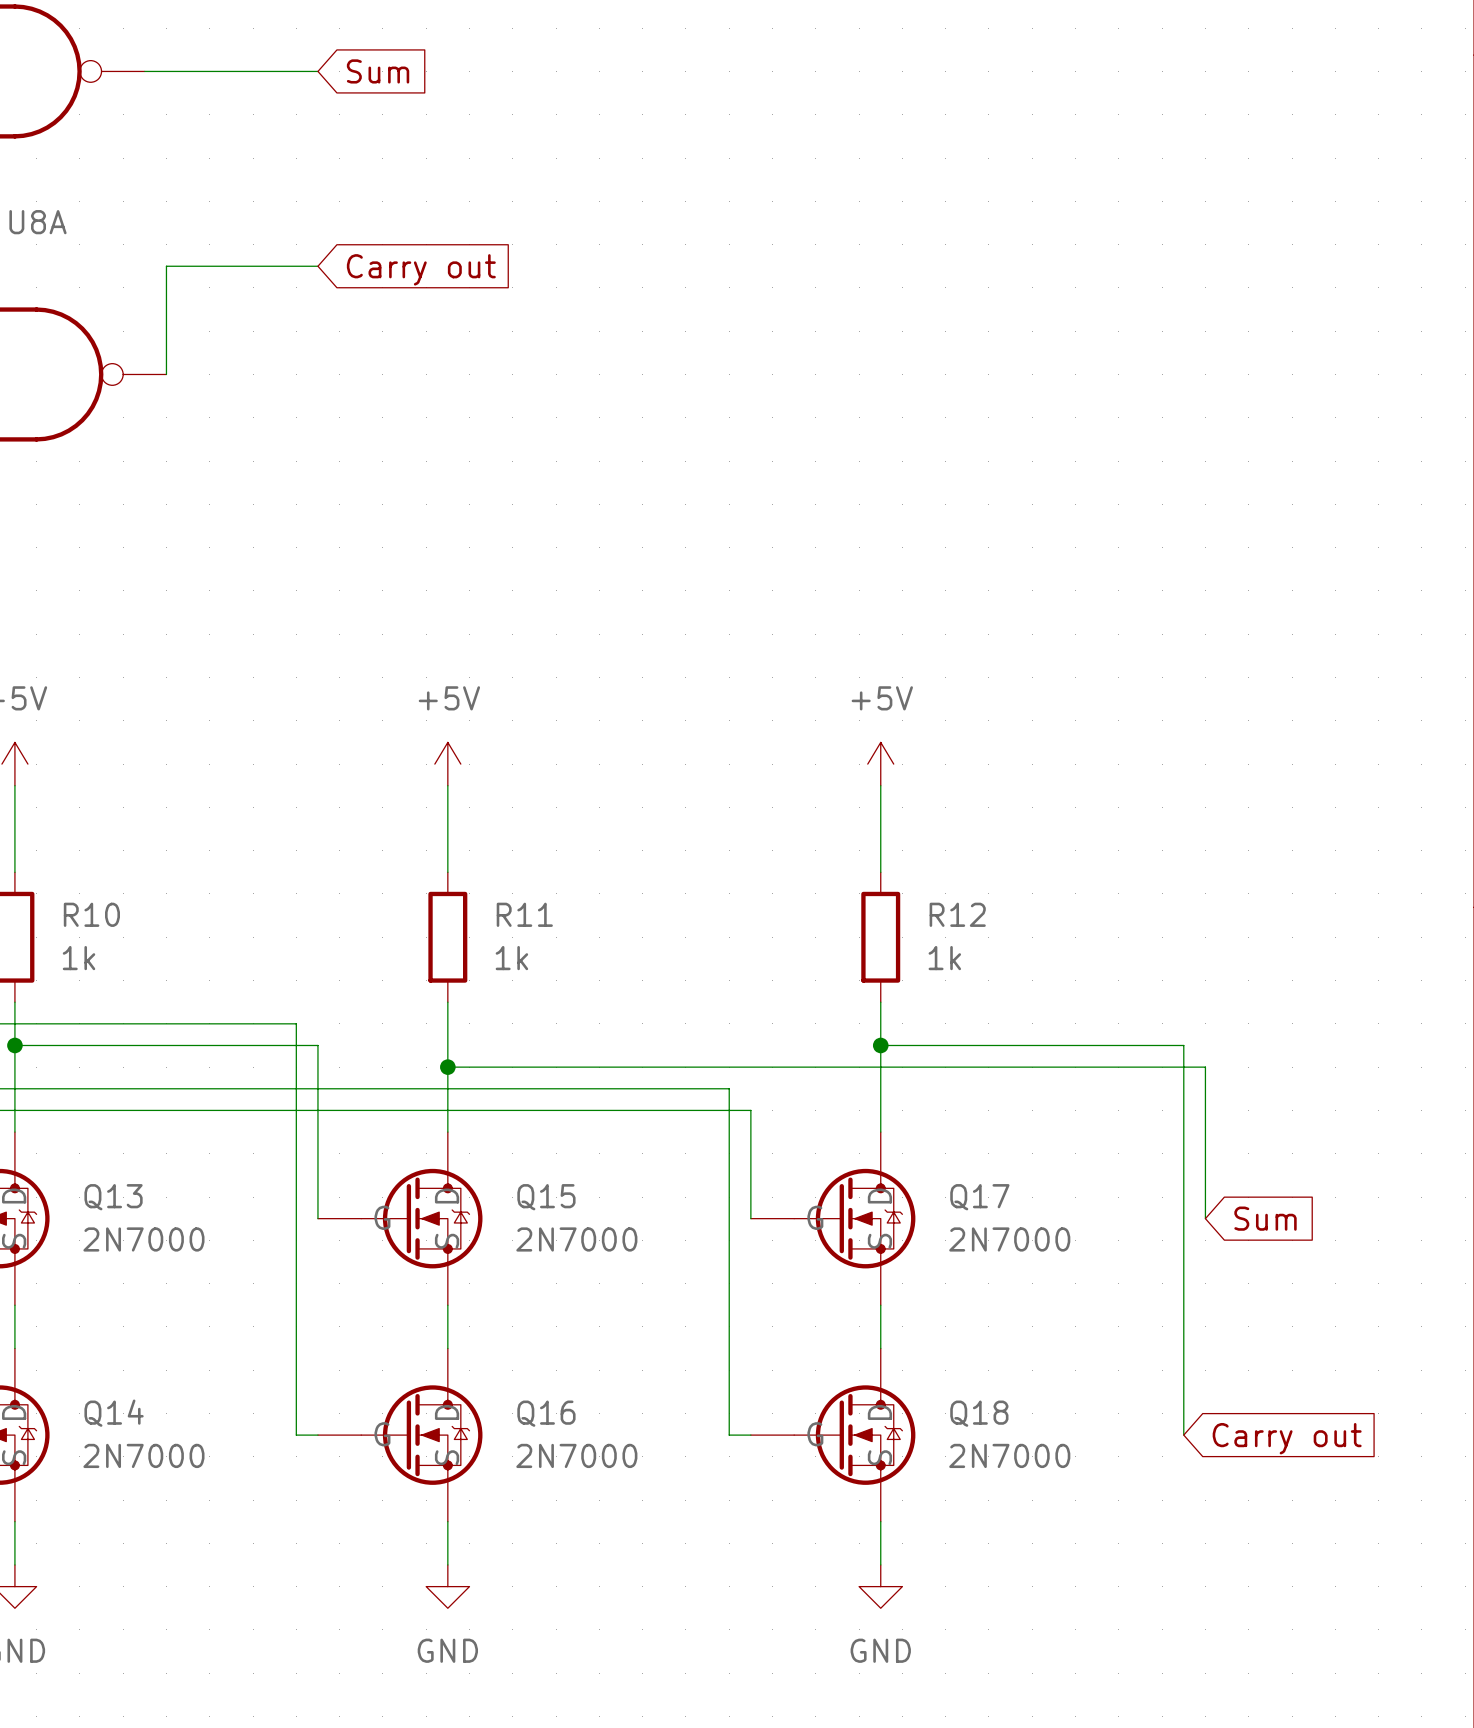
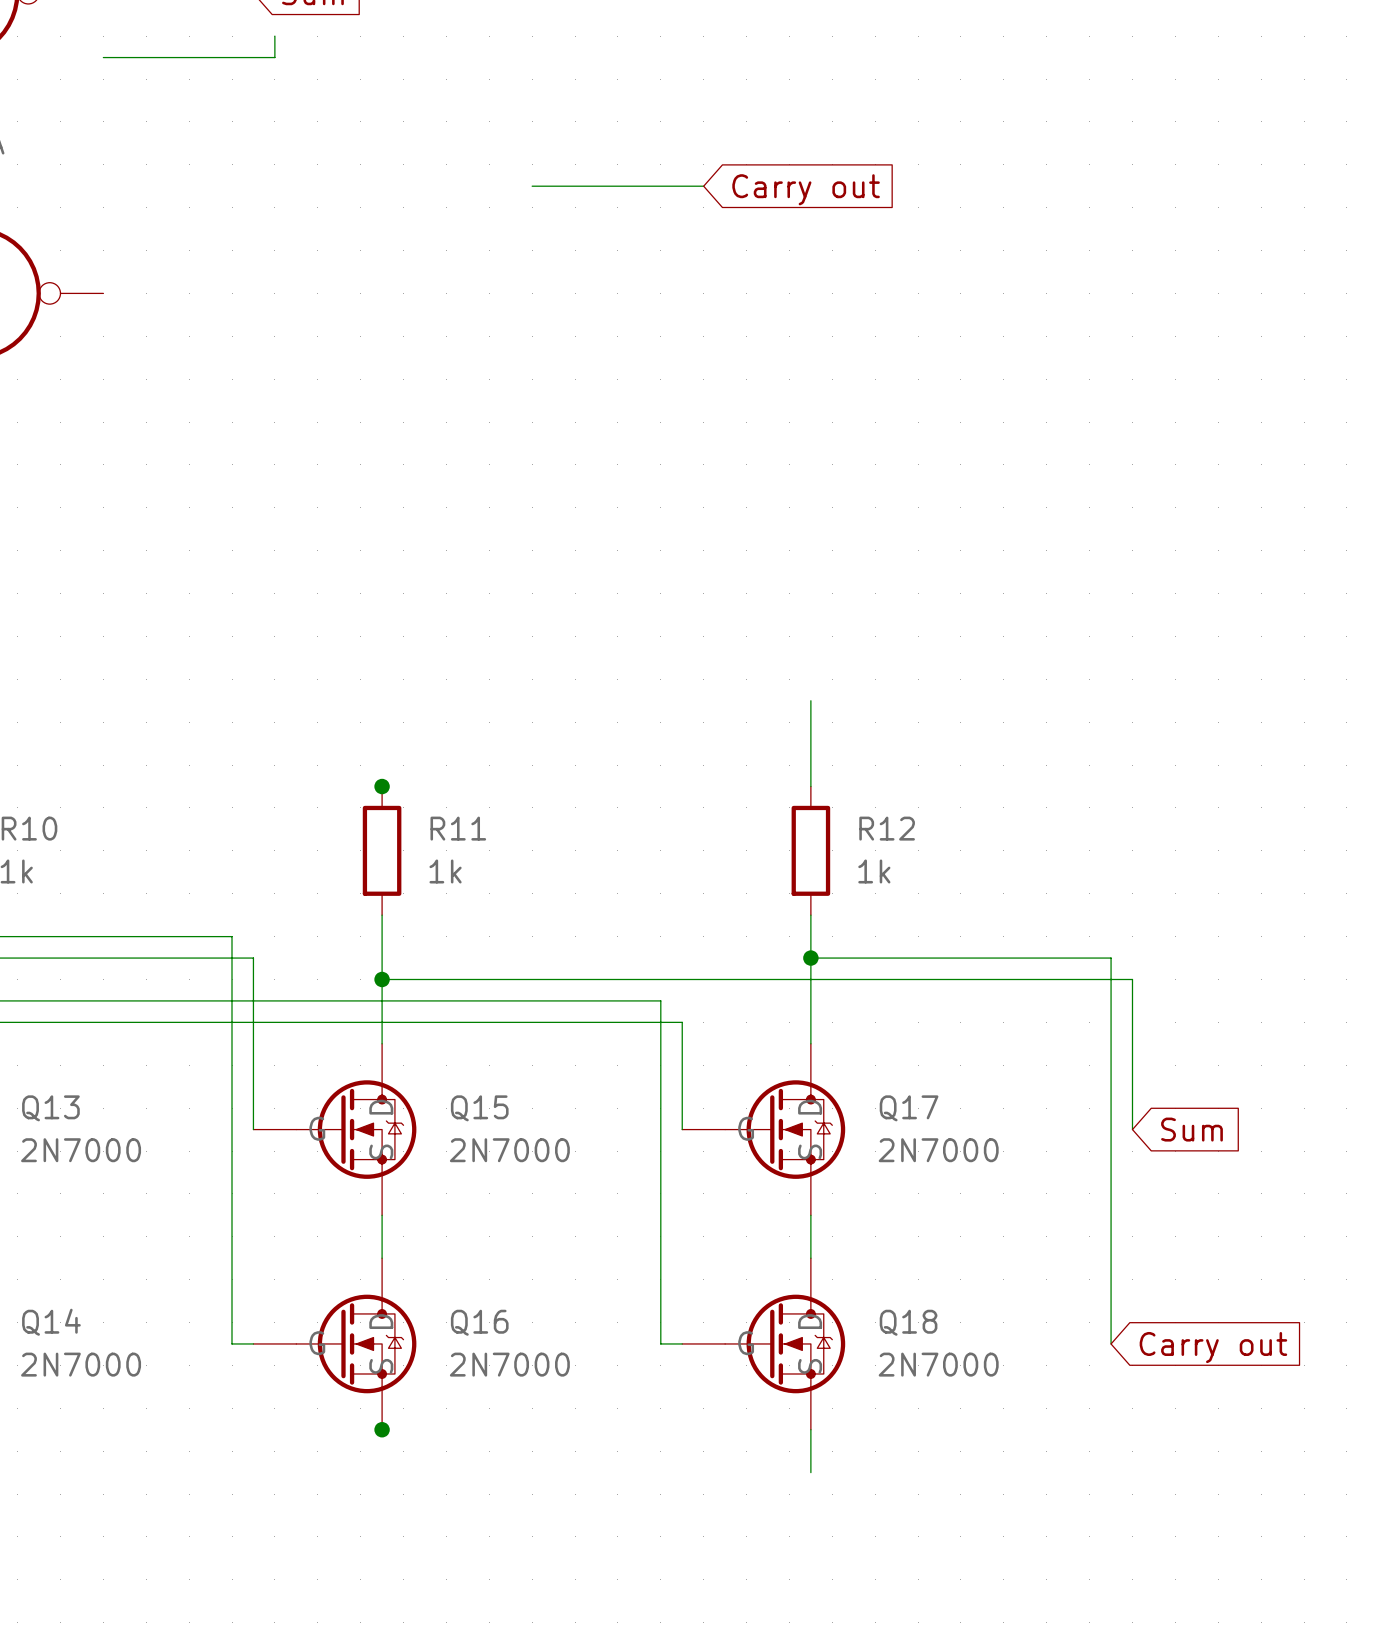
wire: none -> (274, 36) (274, 57) (103, 57)
wire: (317, 266) (166, 266) (166, 374) -> none
wire: none -> (532, 186) (703, 186)
global label: Carry out (421, 269) -> none
global label: none -> Carry out (806, 189)
power symbol: +5V (447, 764) -> none
power symbol: +5V (880, 764) -> none
wire: (447, 785) (447, 872) -> none
junction: none -> (382, 786)
wire: (447, 1521) (447, 1564) -> none
junction: none -> (382, 1429)
power symbol: GND (447, 1586) -> none
power symbol: GND (880, 1586) -> none

